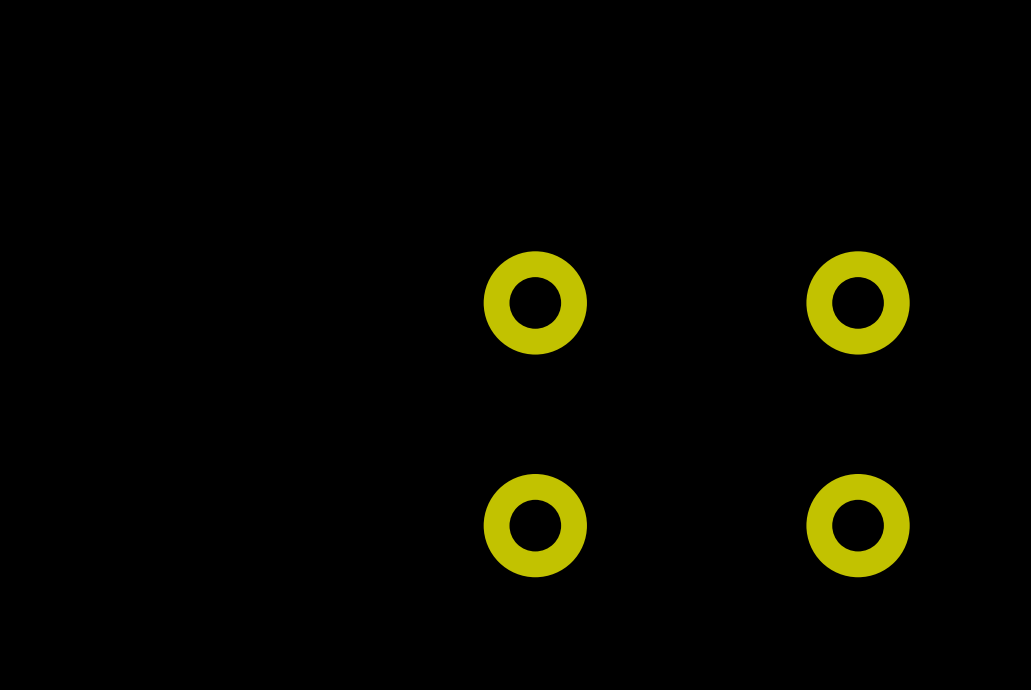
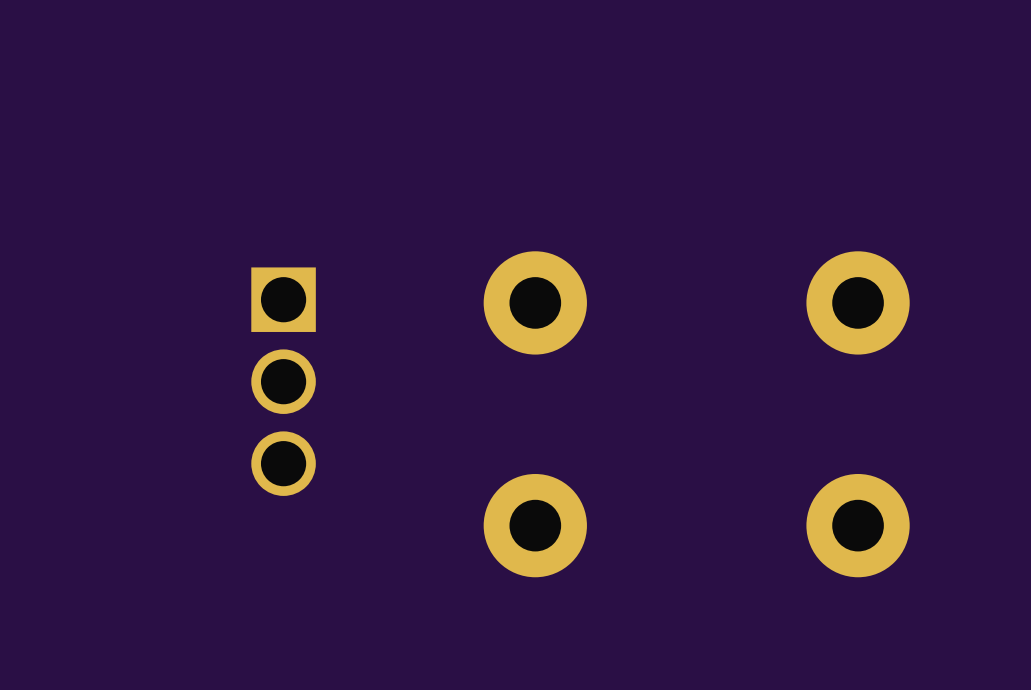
part: none -> (283, 381)

